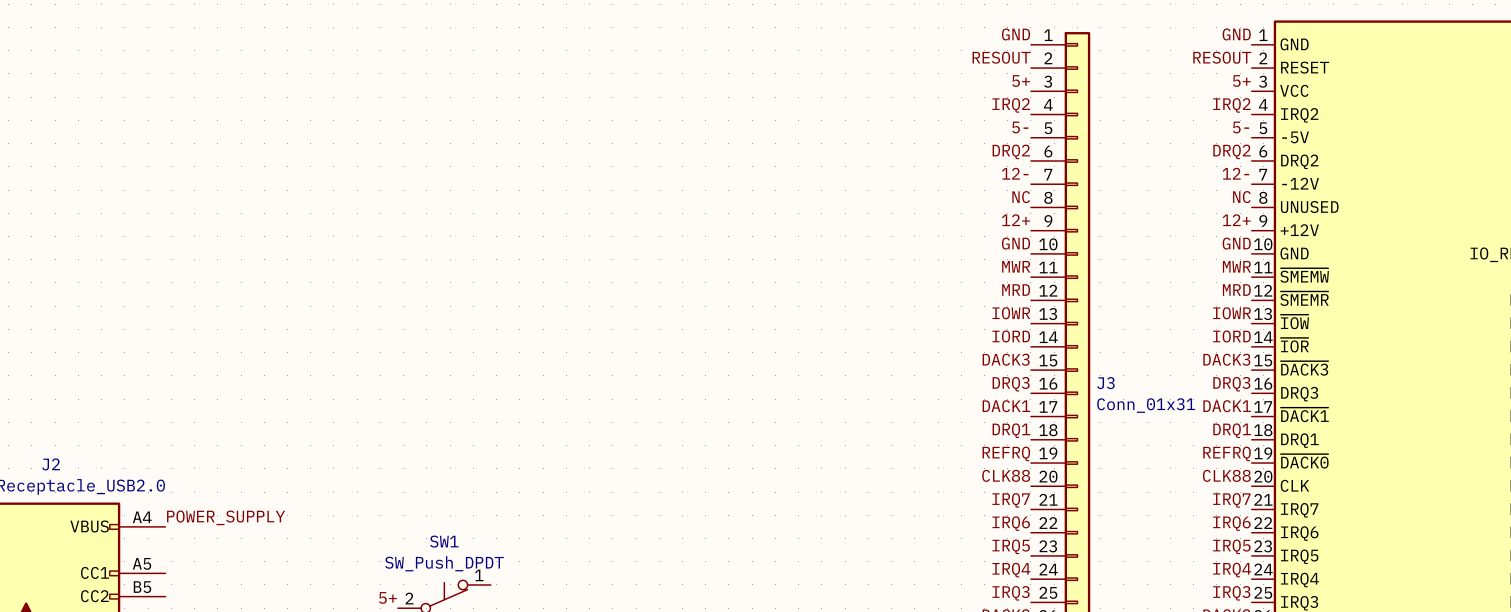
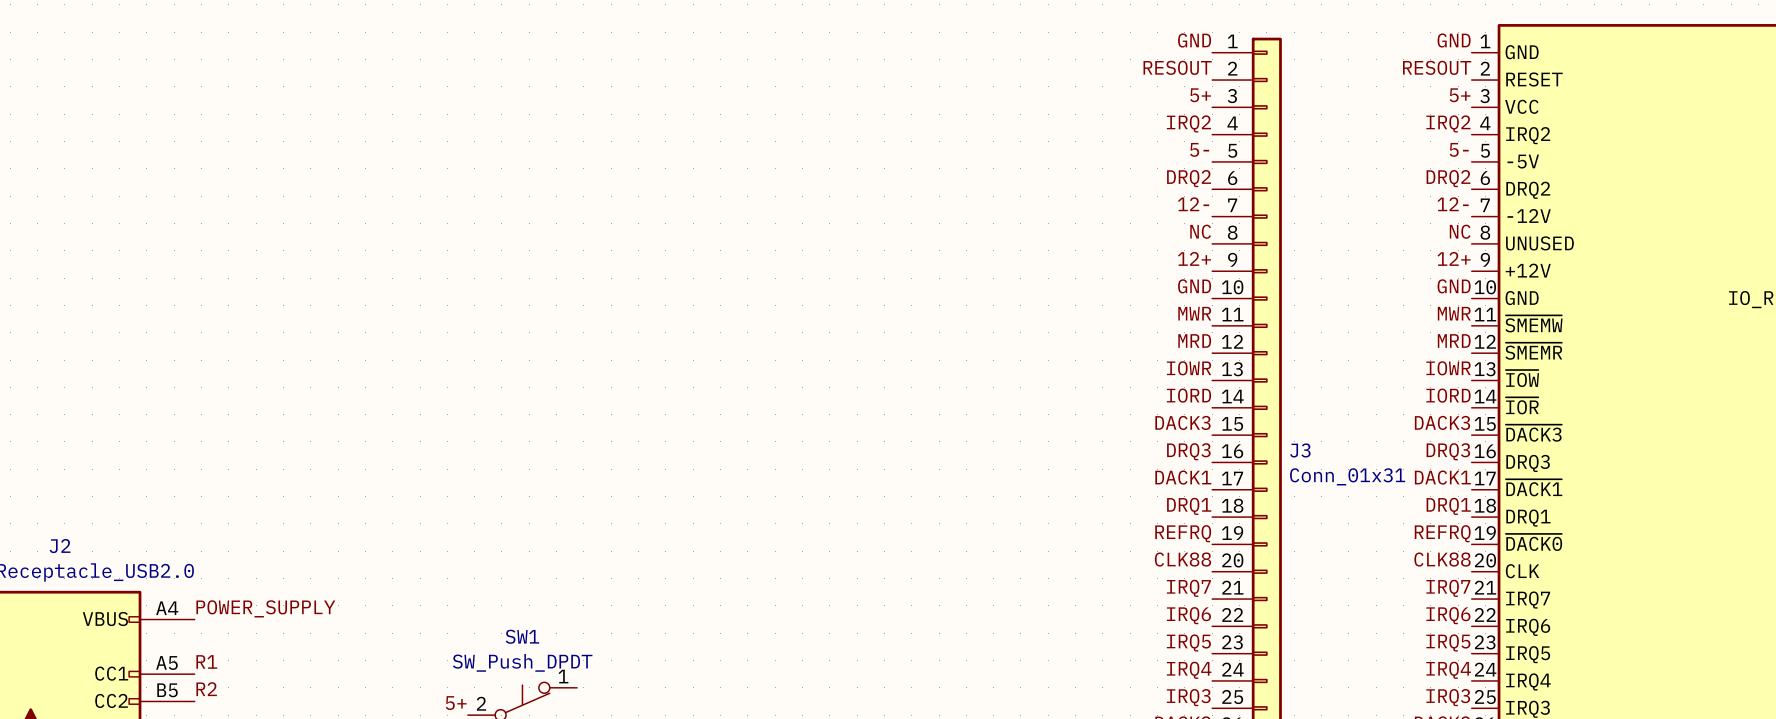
label: none -> R1 (206, 661)
label: none -> R2 (206, 689)

